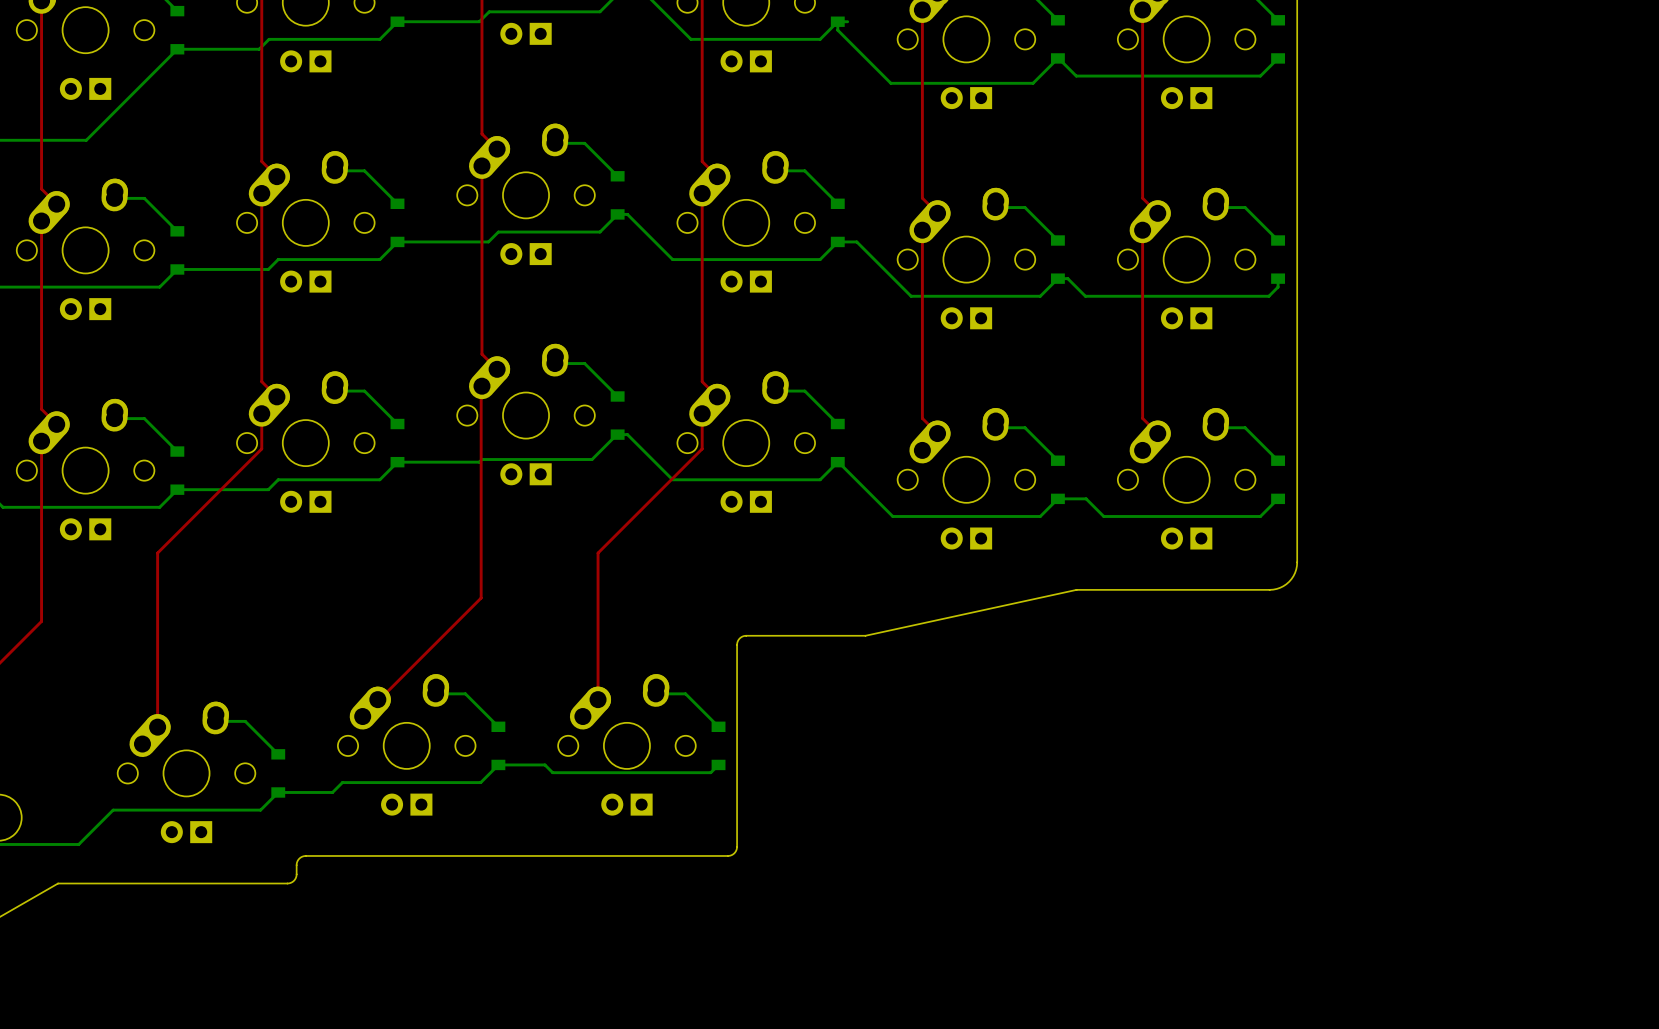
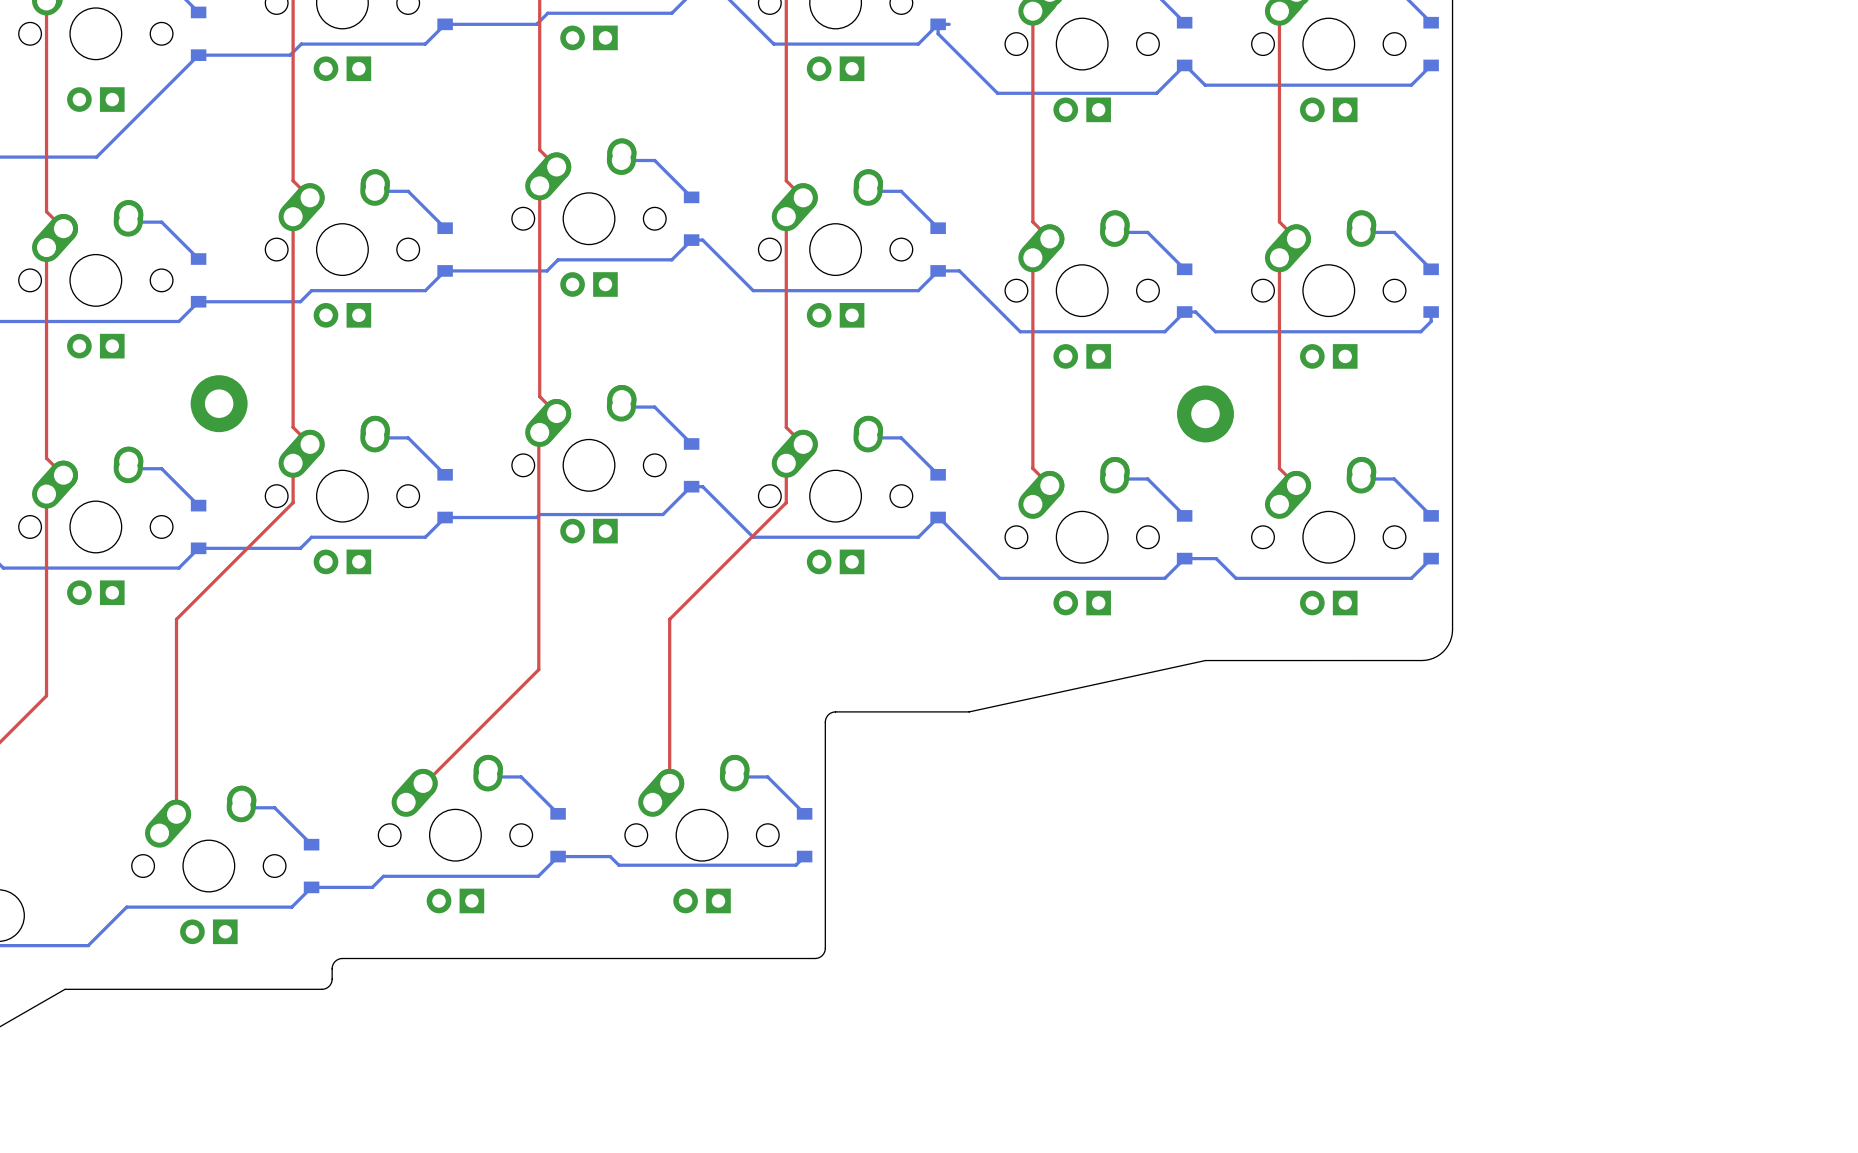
part: none -> (219, 403)
part: none -> (1205, 413)

